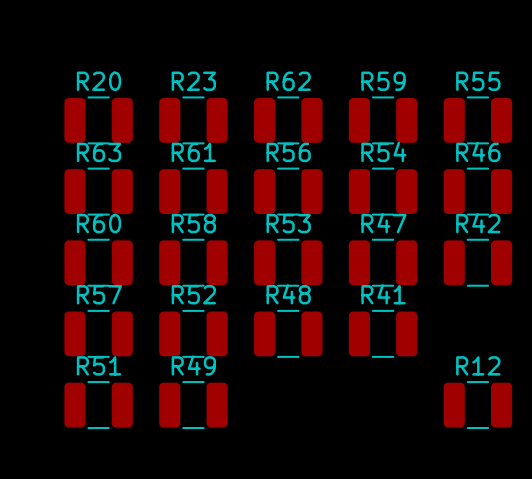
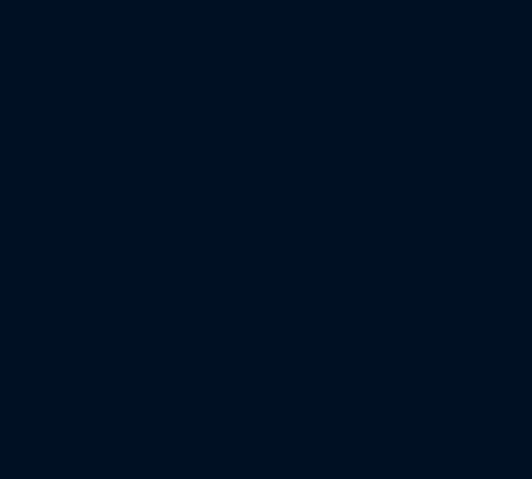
R20: (98, 120) -> none
R23: (193, 120) -> none
R62: (288, 120) -> none
R59: (383, 120) -> none
R55: (477, 120) -> none
R63: (98, 191) -> none
R61: (193, 191) -> none
R56: (288, 191) -> none
R54: (383, 191) -> none
R46: (477, 191) -> none
R60: (98, 262) -> none
R58: (193, 262) -> none
R53: (288, 262) -> none
R47: (383, 262) -> none
R42: (477, 262) -> none
R57: (98, 333) -> none
R52: (193, 333) -> none
R48: (288, 333) -> none
R41: (383, 333) -> none
R51: (98, 405) -> none
R49: (193, 405) -> none
R12: (477, 405) -> none

